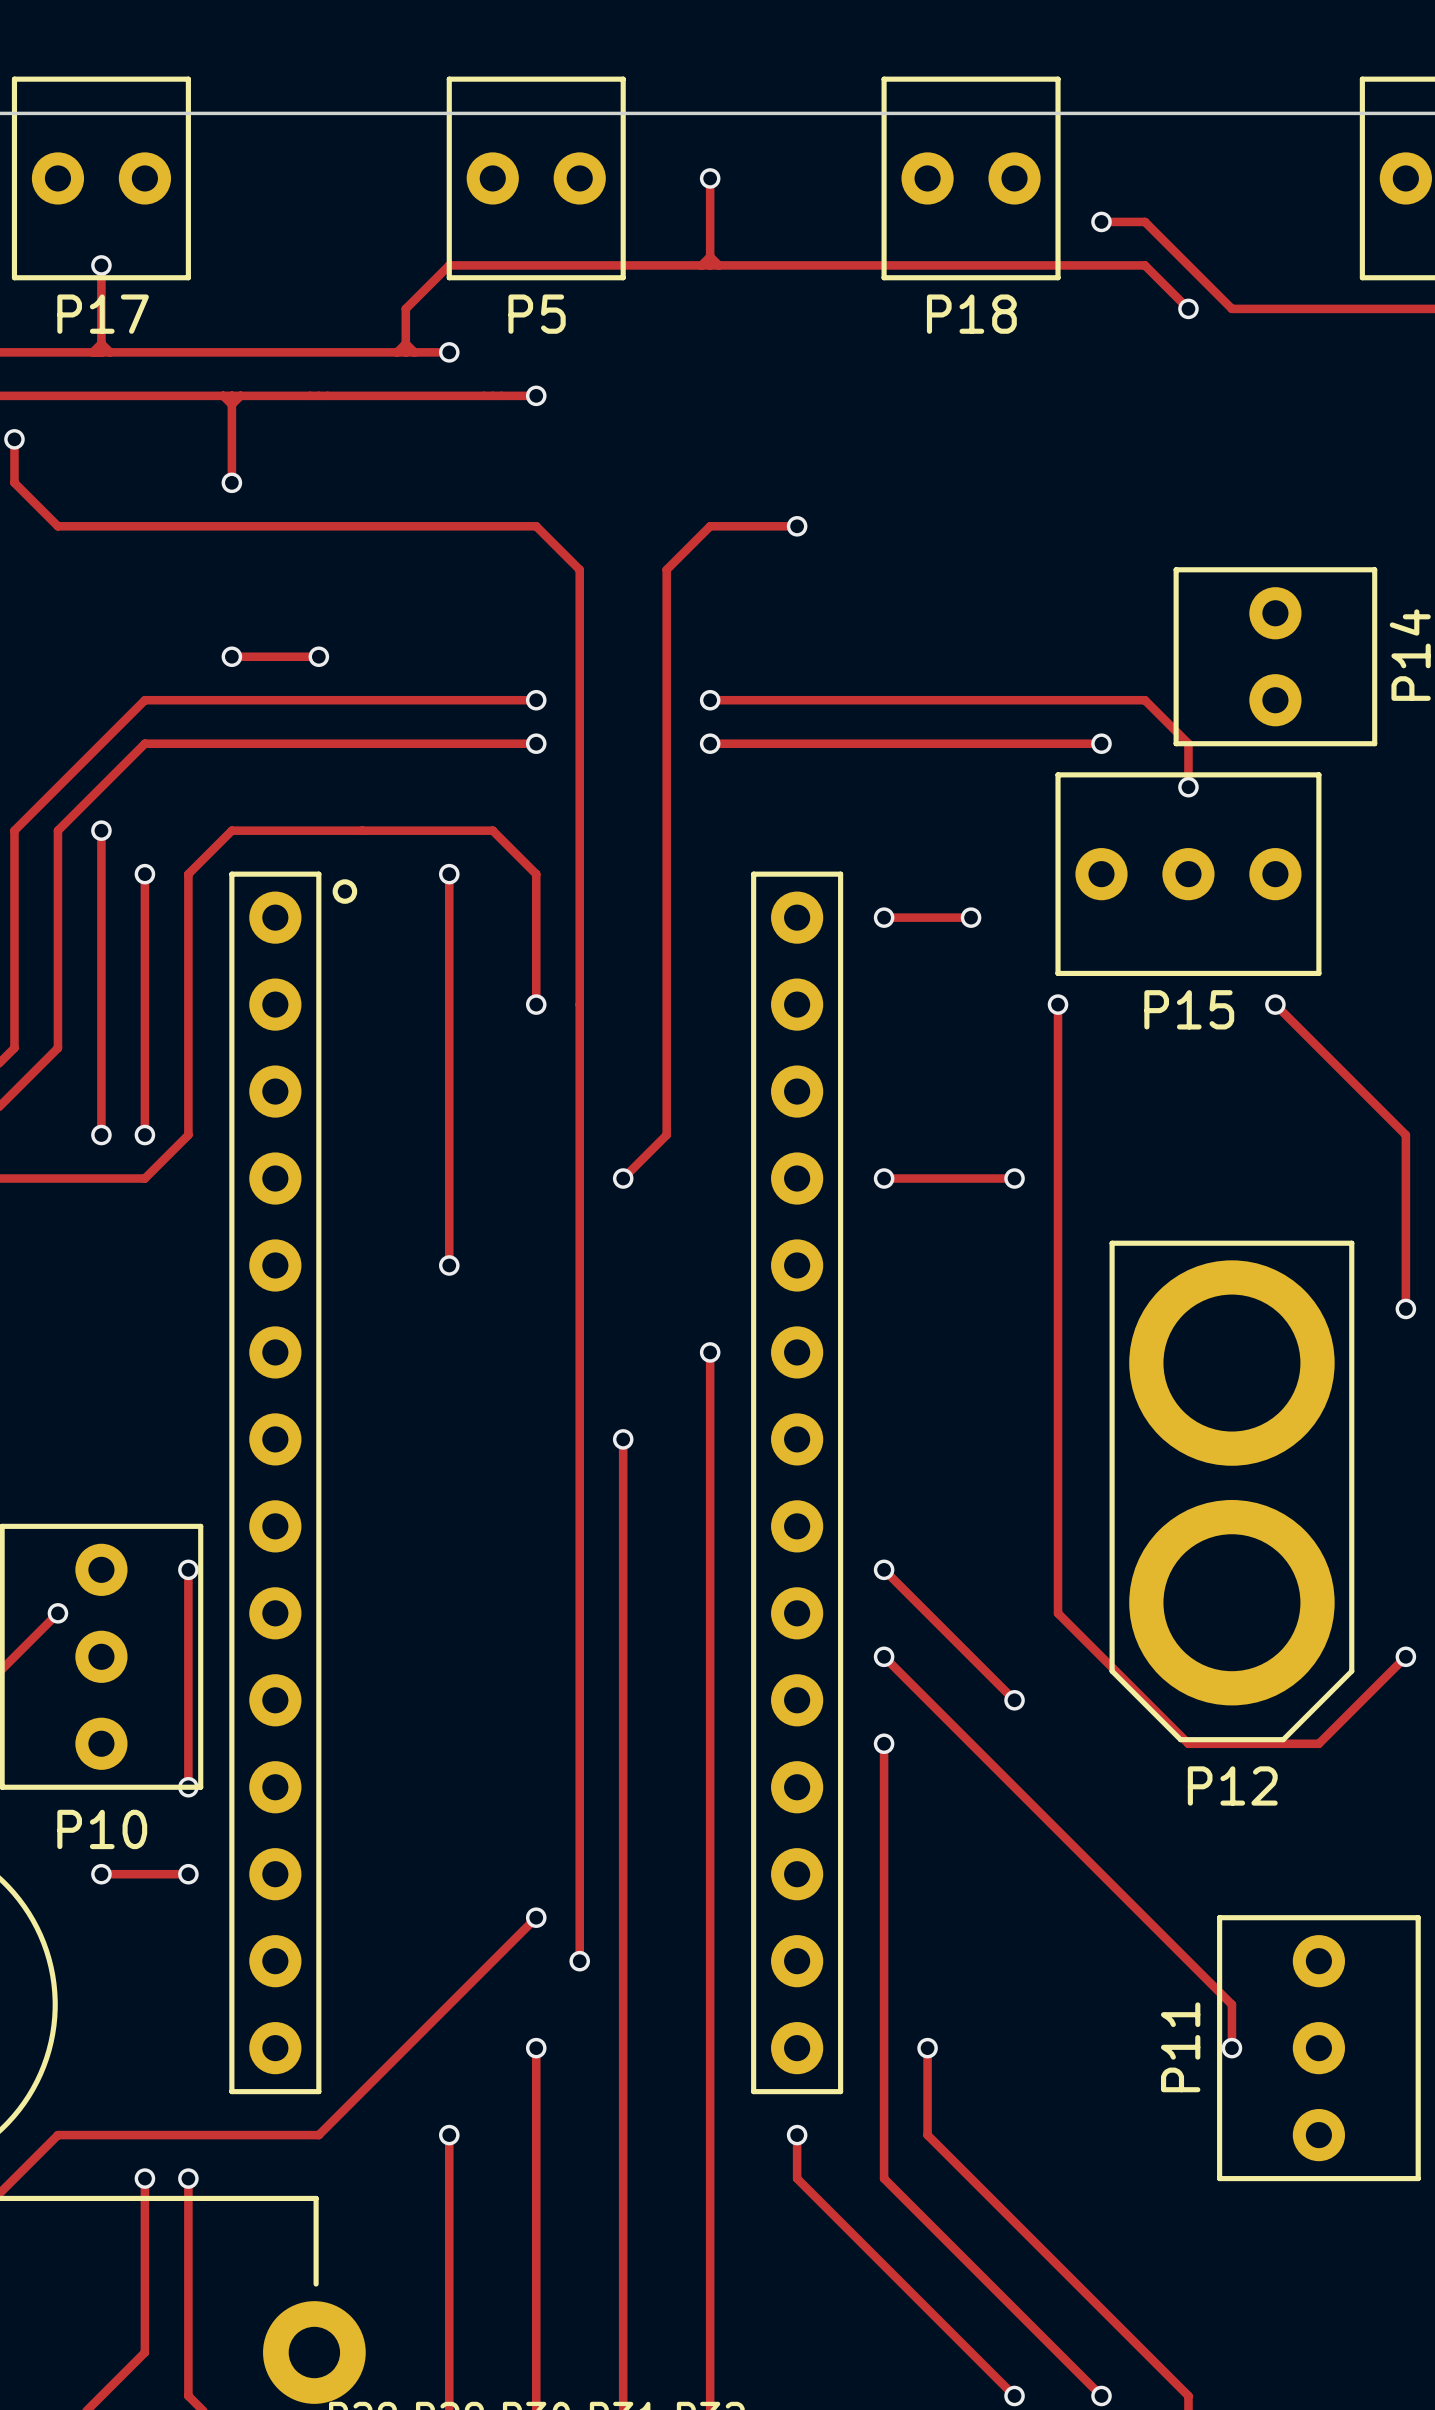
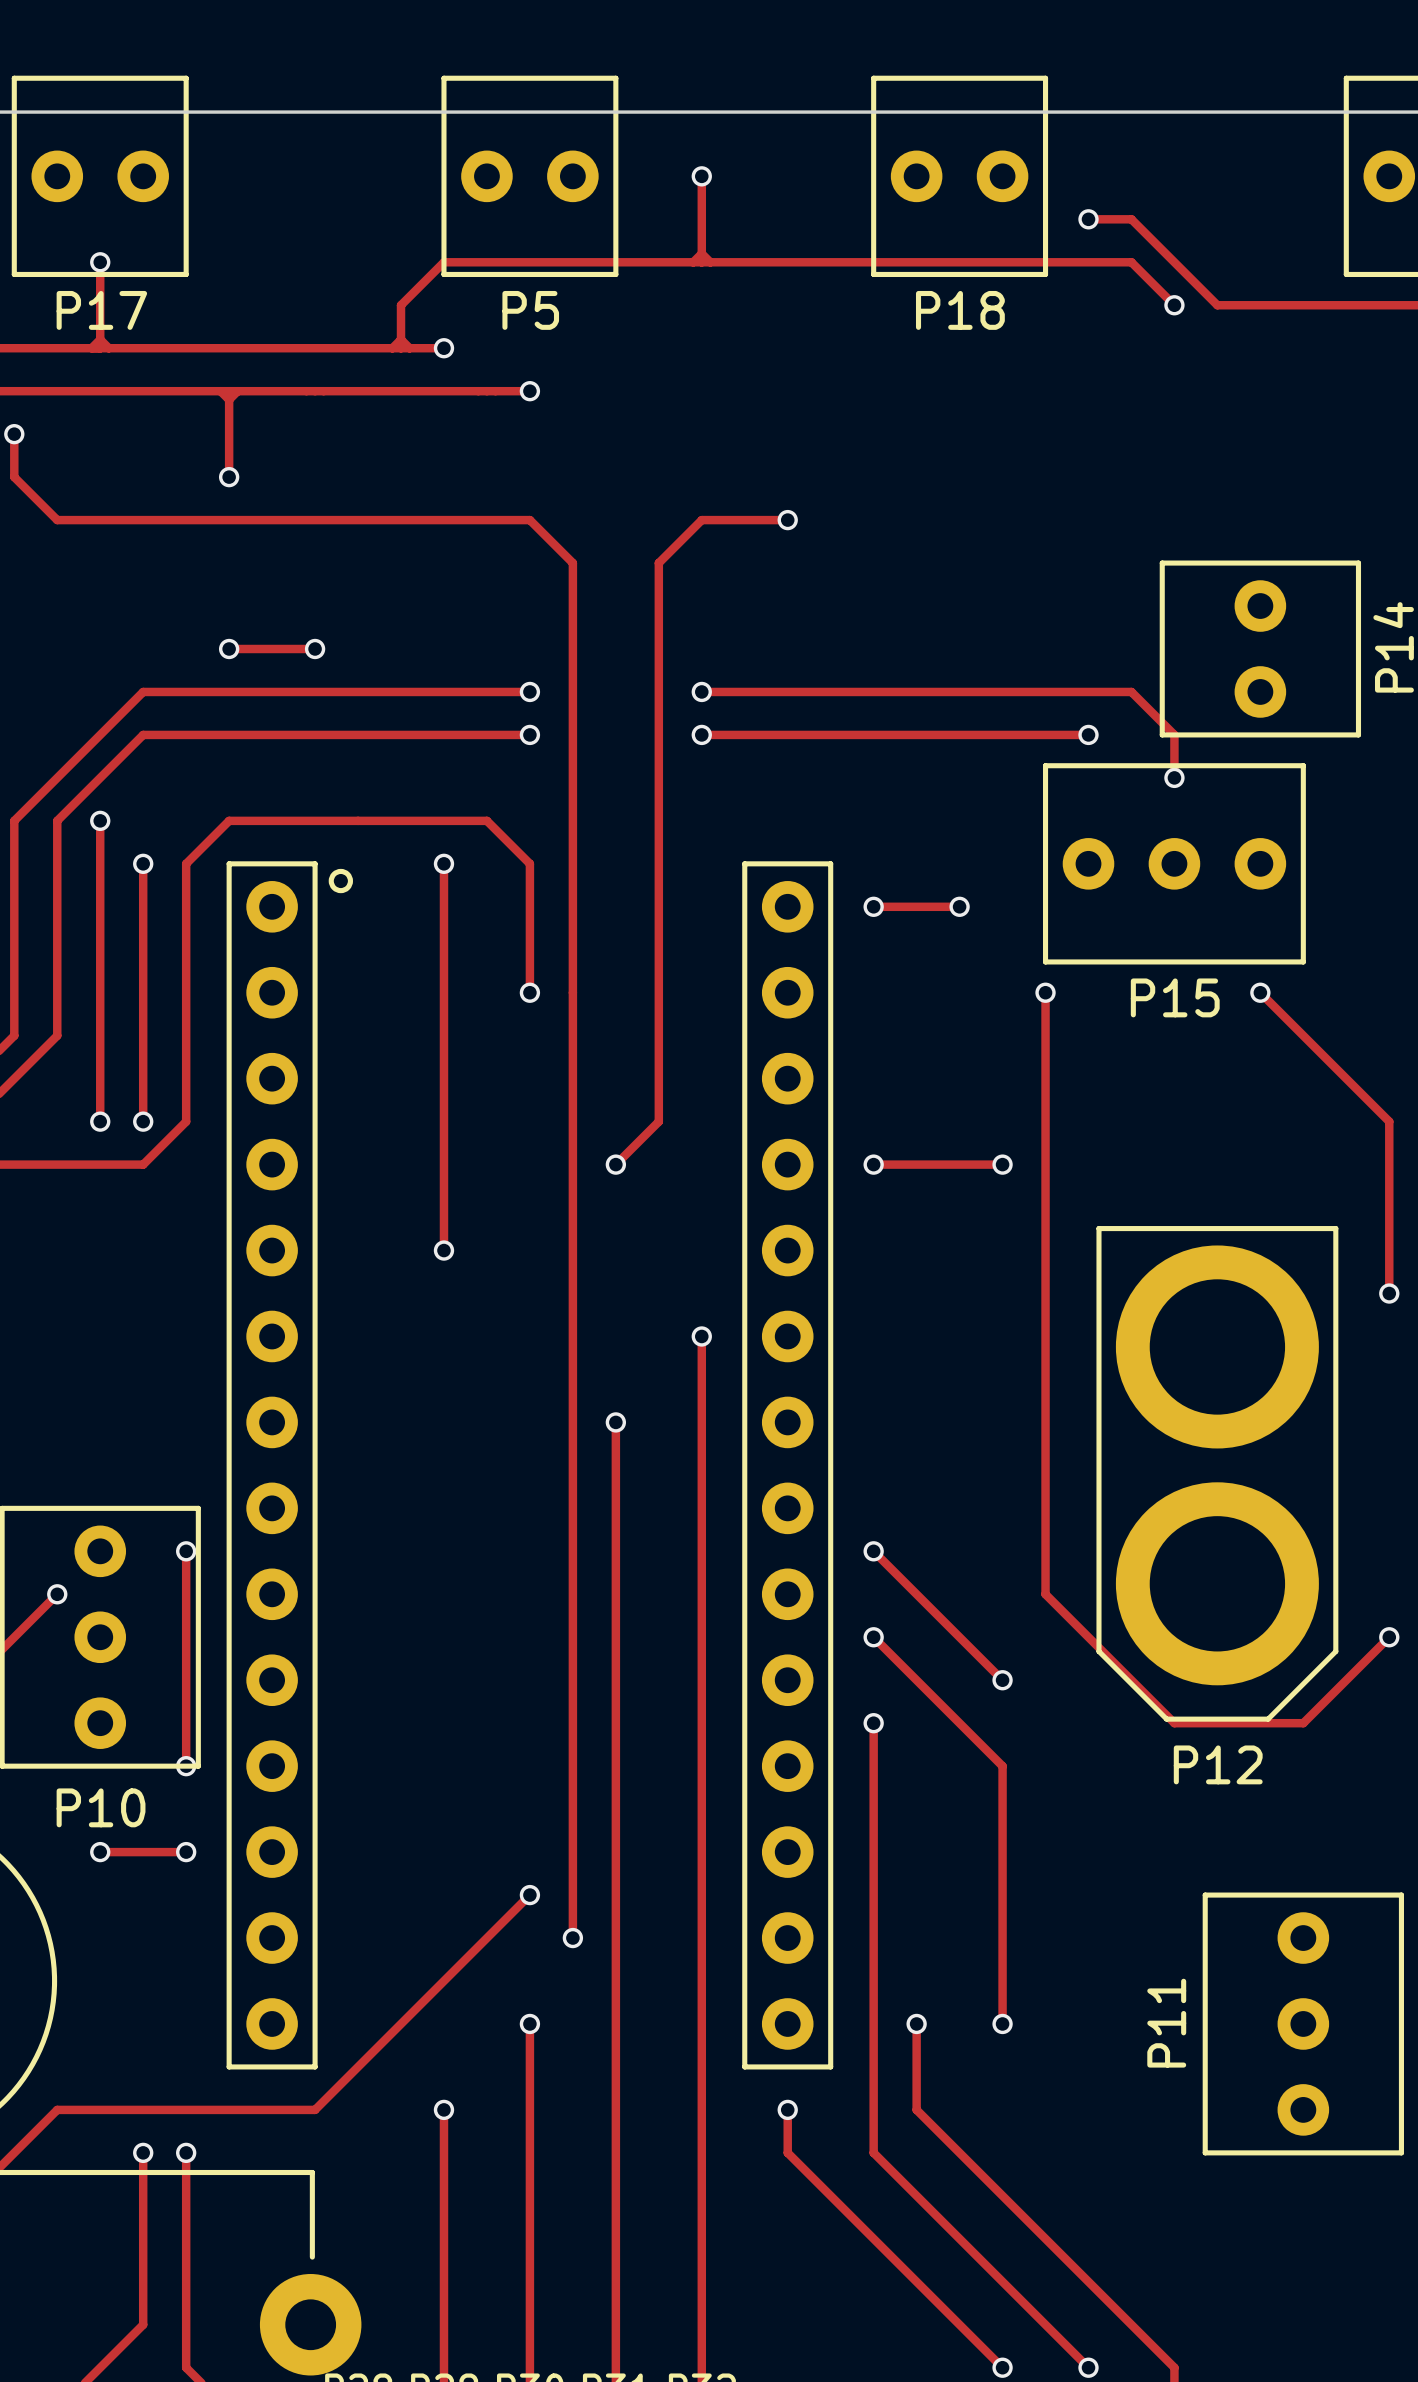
track: (1014, 1787) (1231, 2004) (1231, 2048) -> (1002, 1766) (1002, 2023)
via: none -> (1002, 2023)
via: (1231, 2048) -> none

